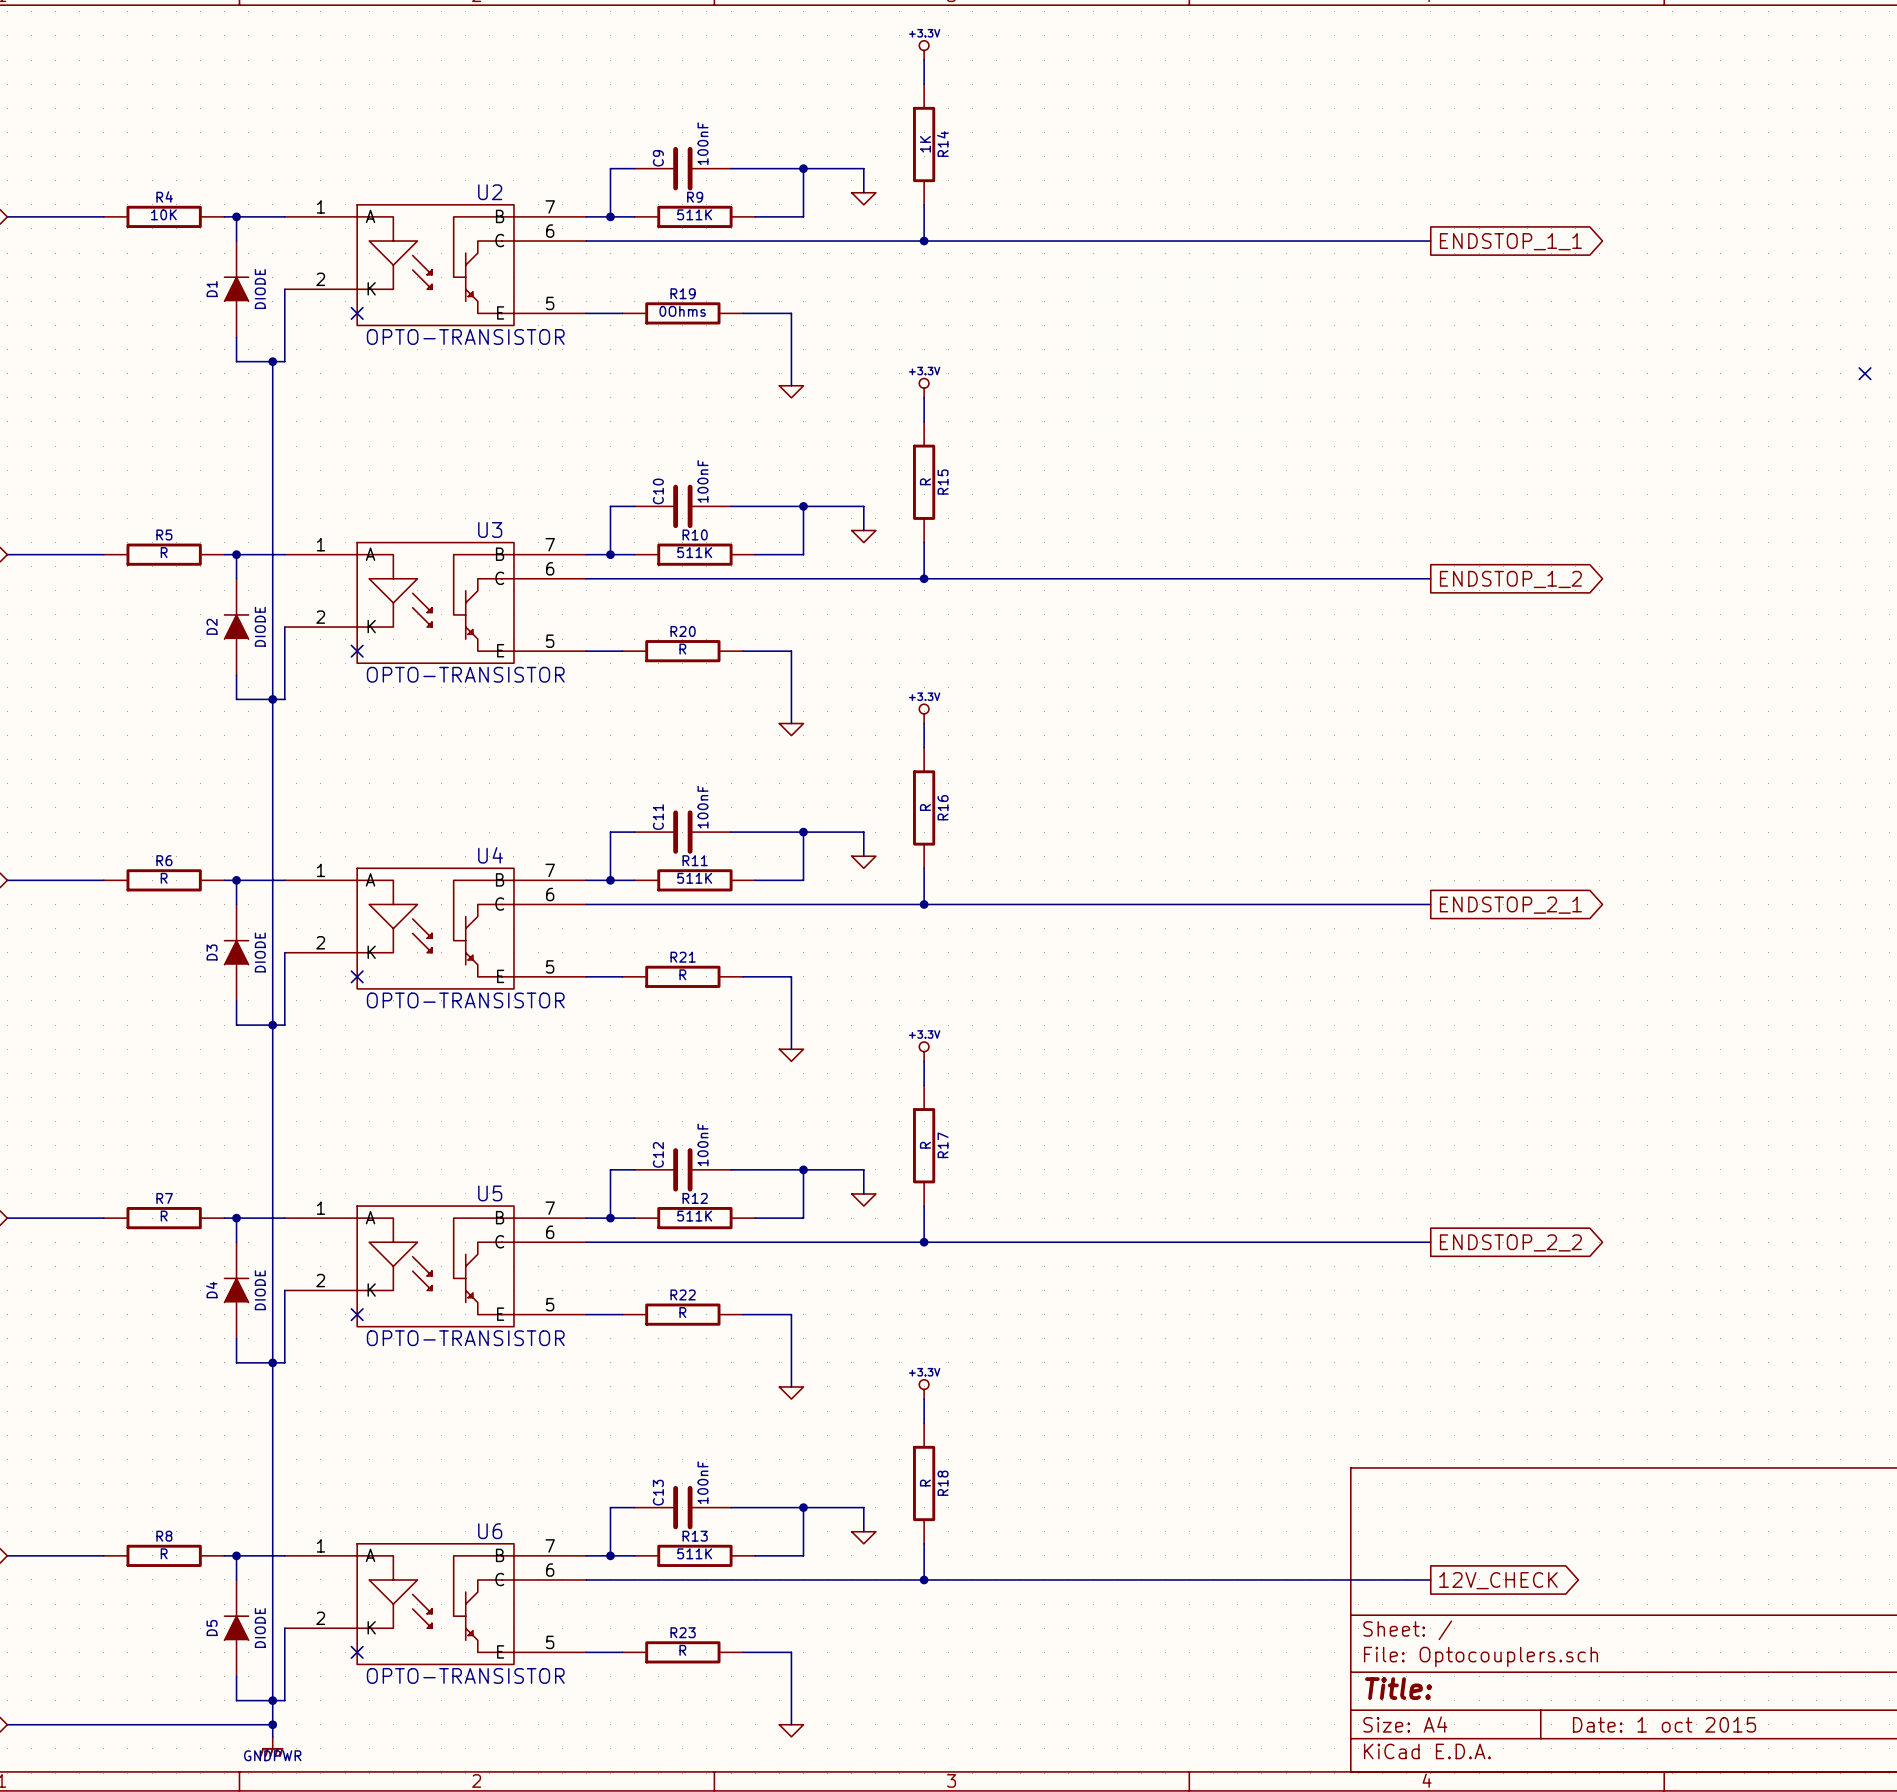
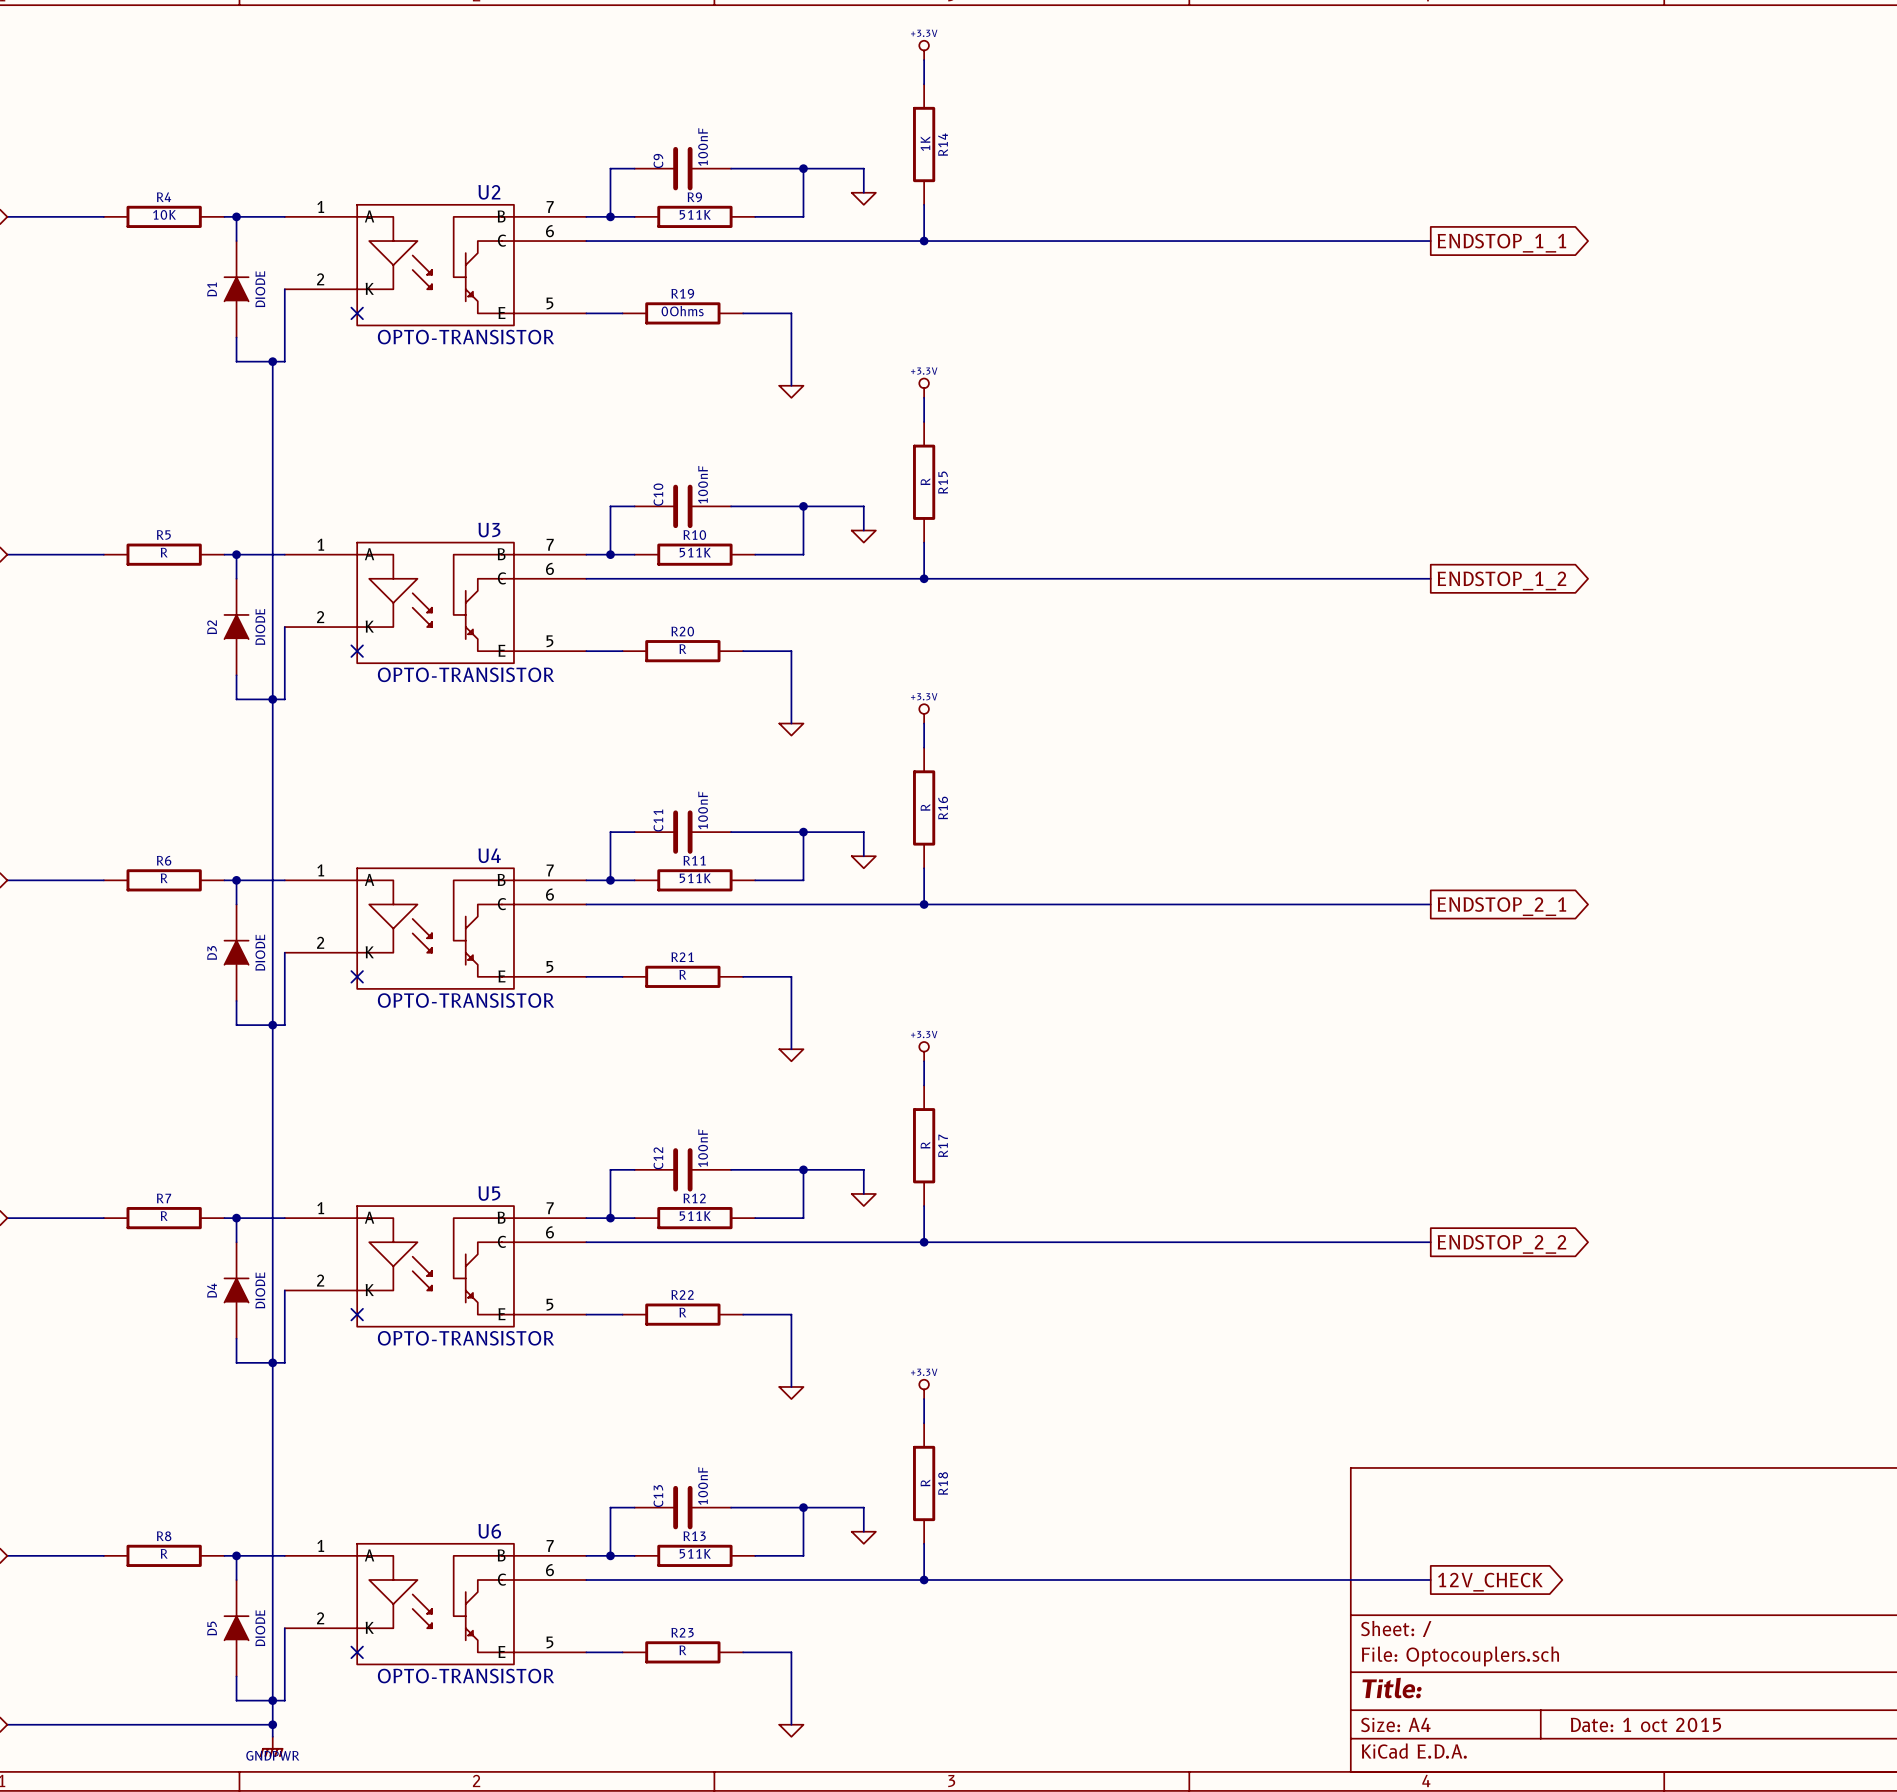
no-connect mark: (1865, 373) -> none

